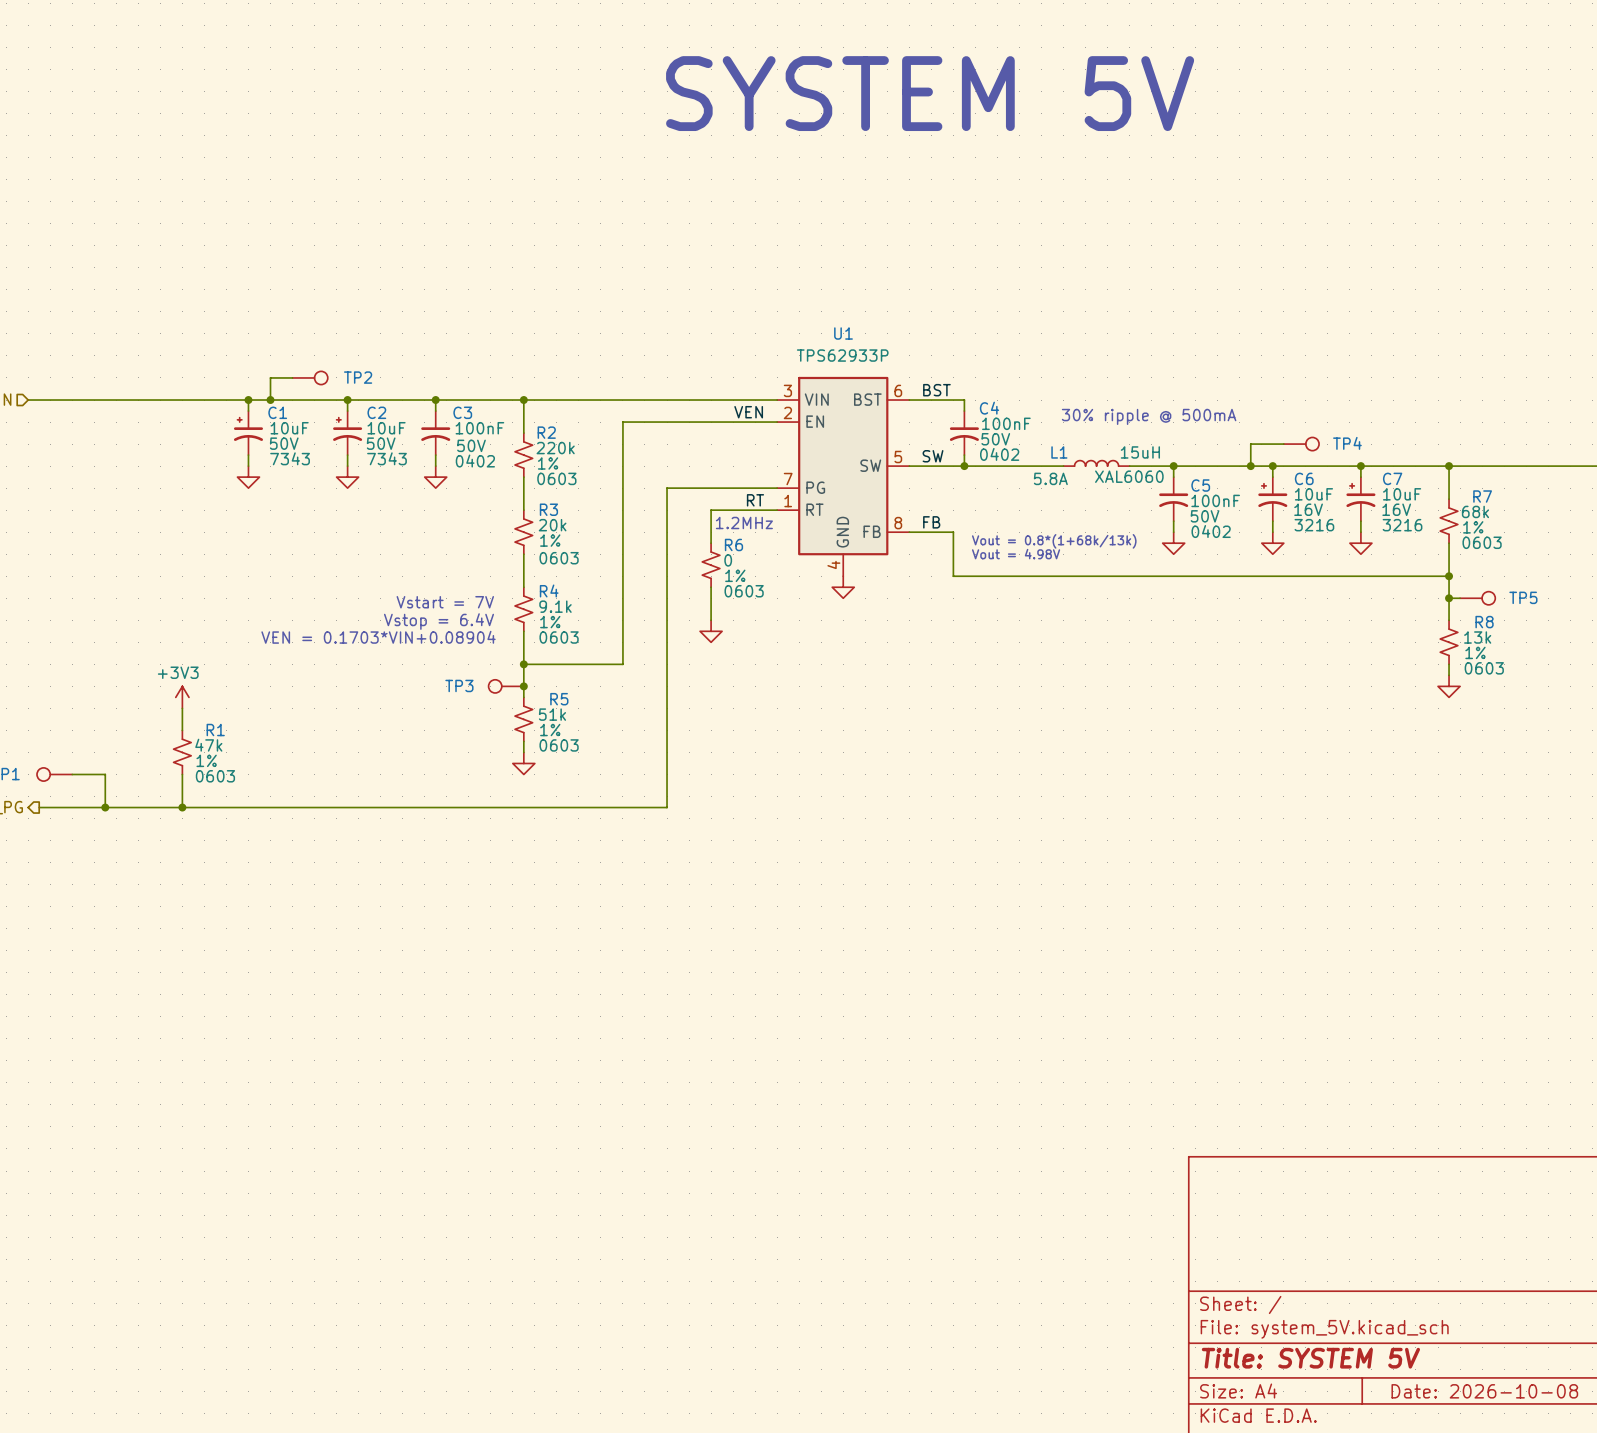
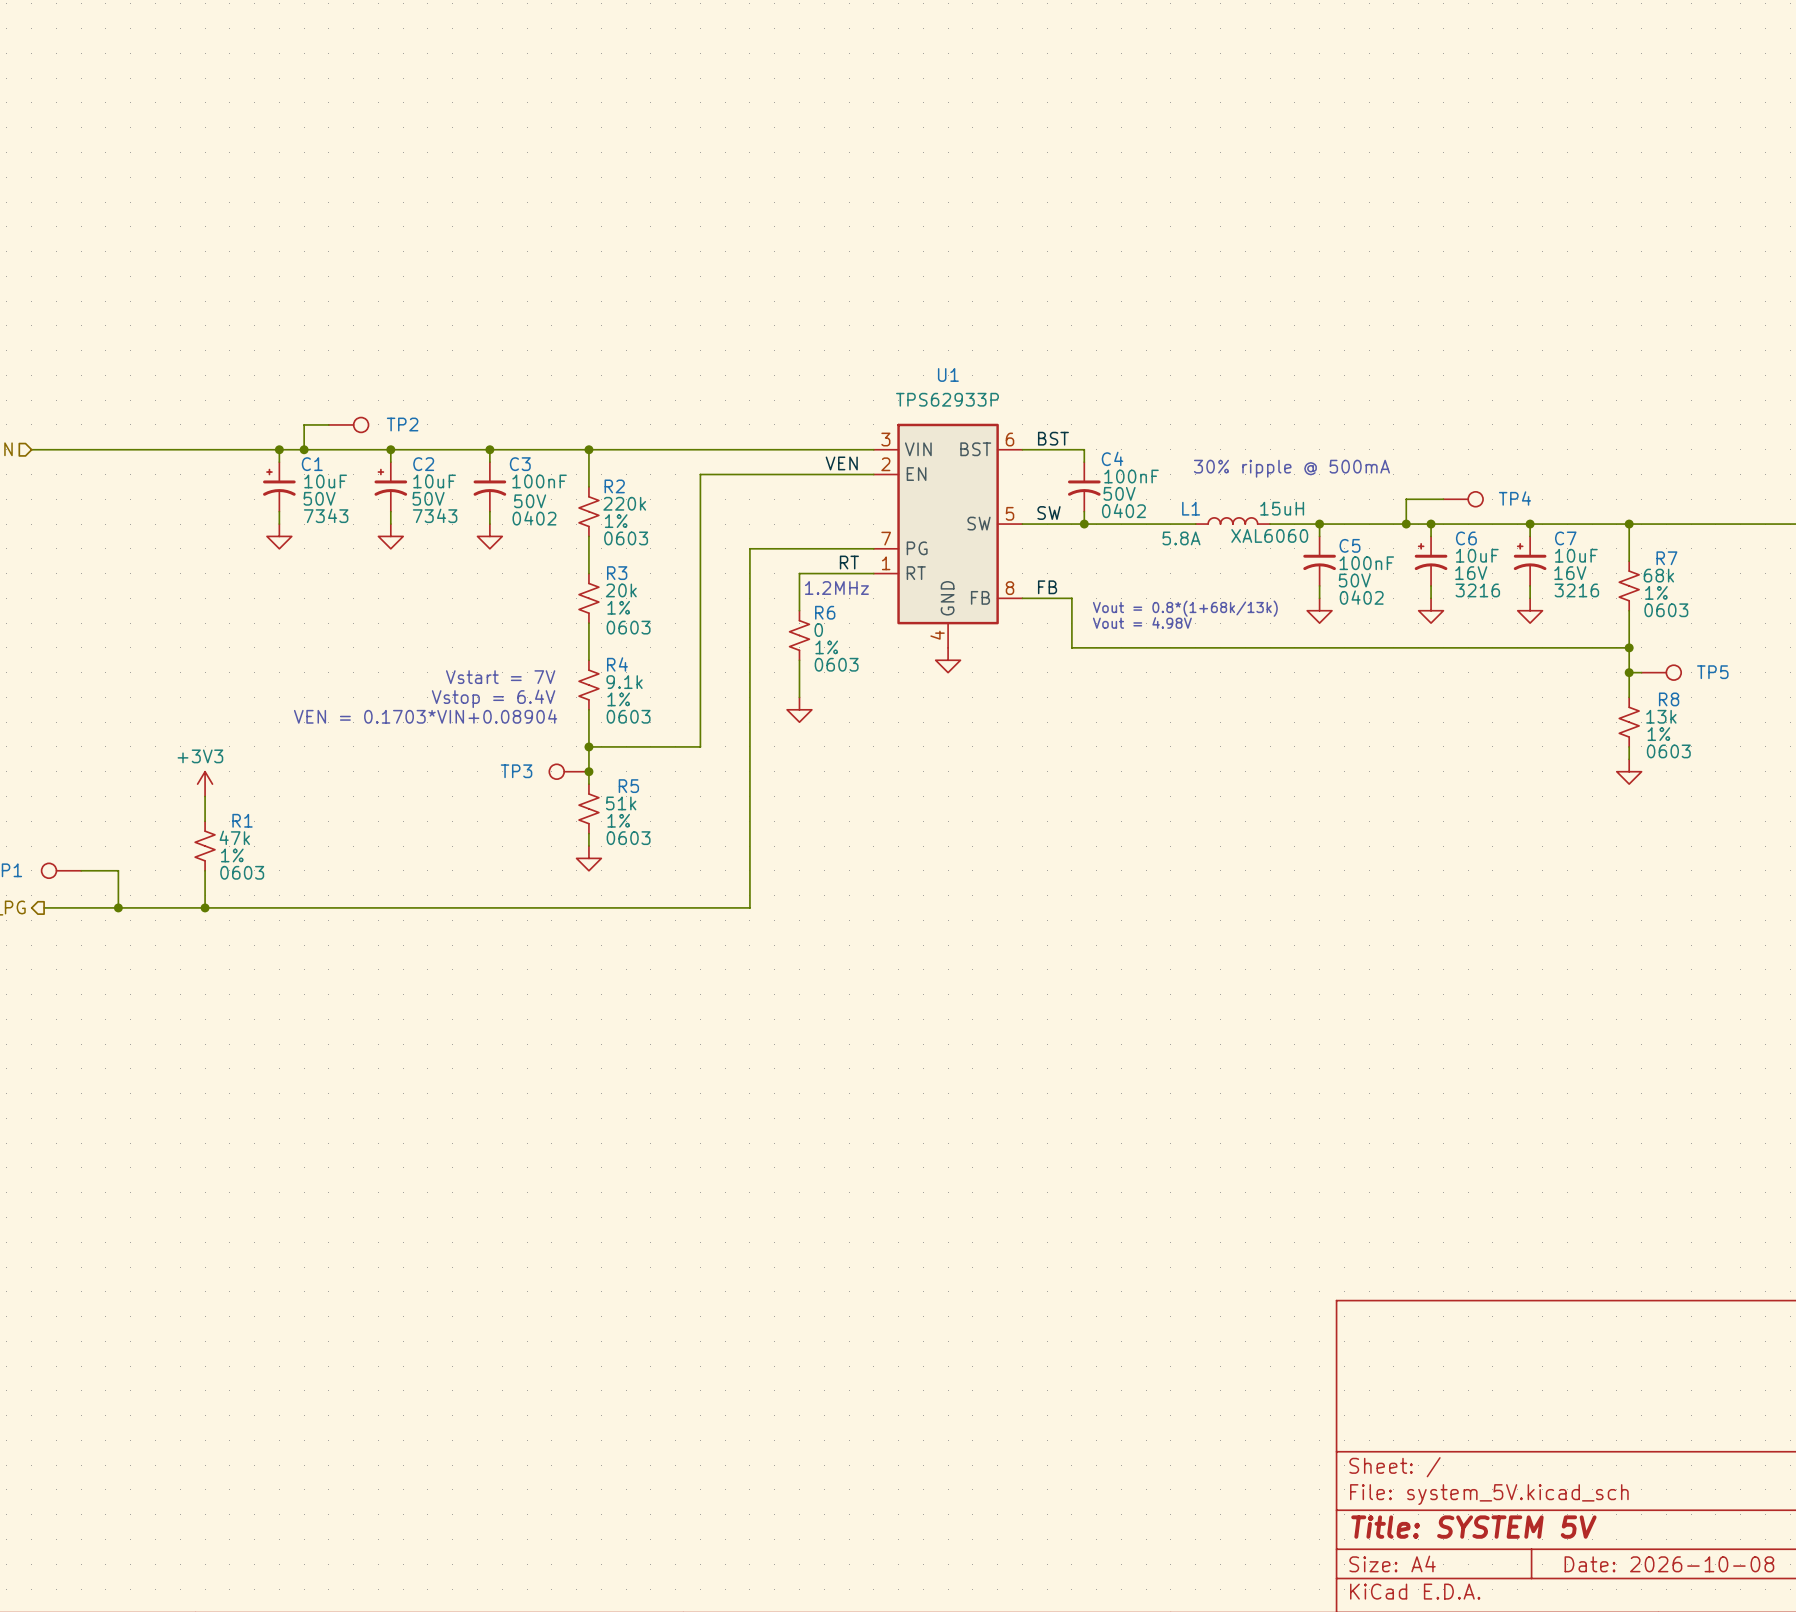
text: SYSTEM 5V (930, 93) -> none

